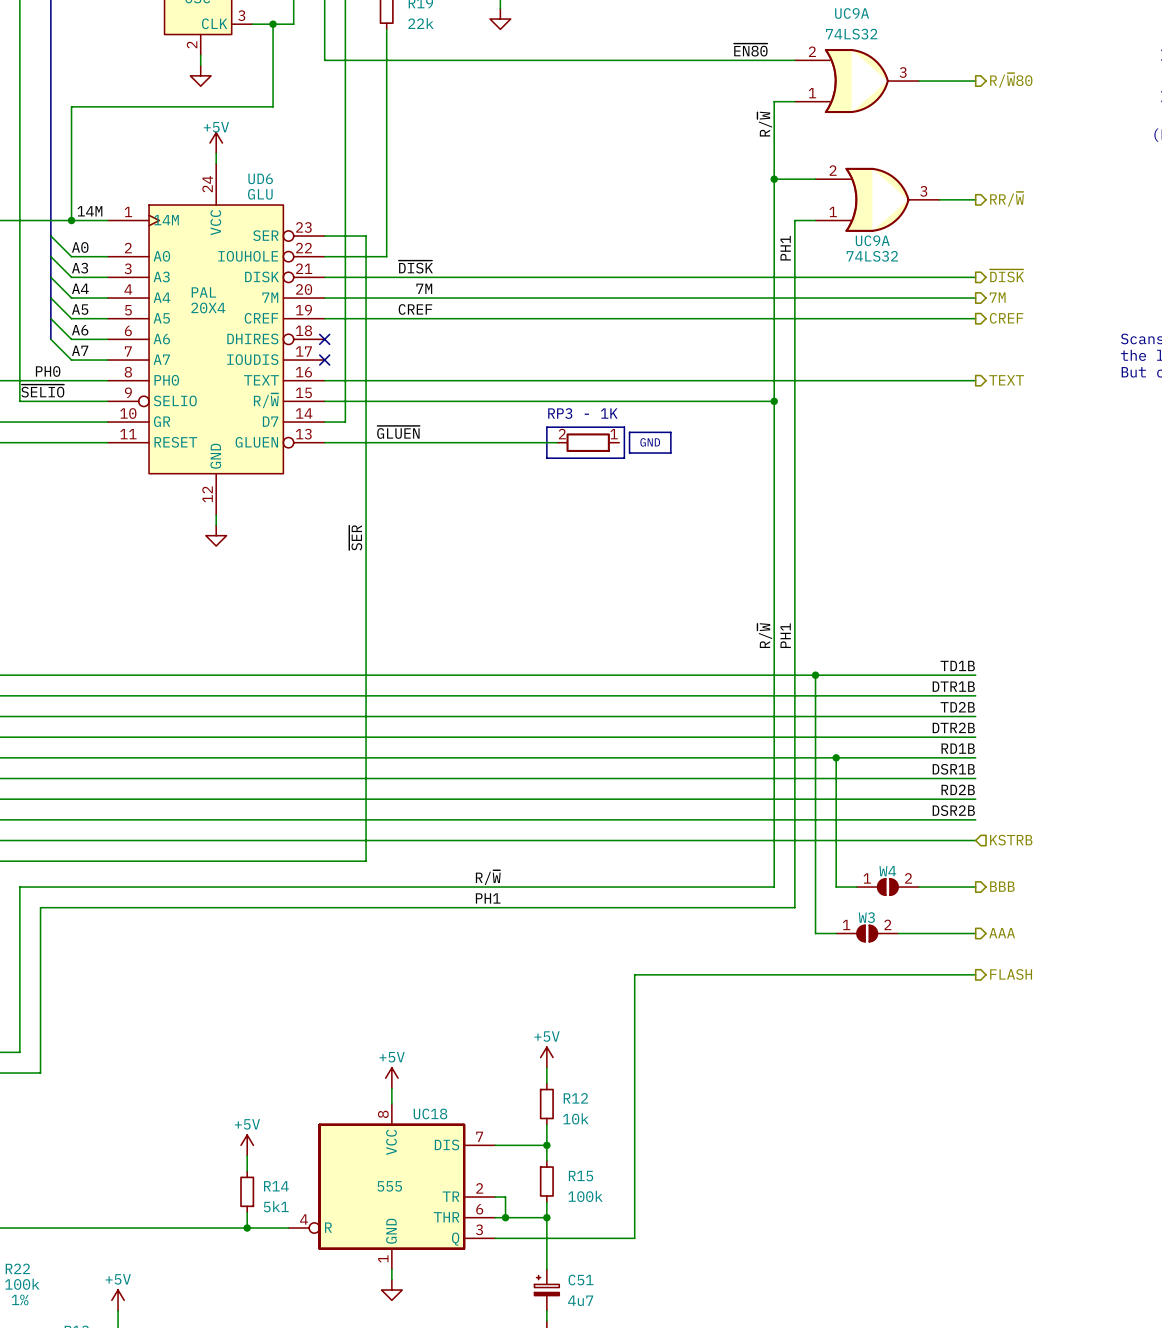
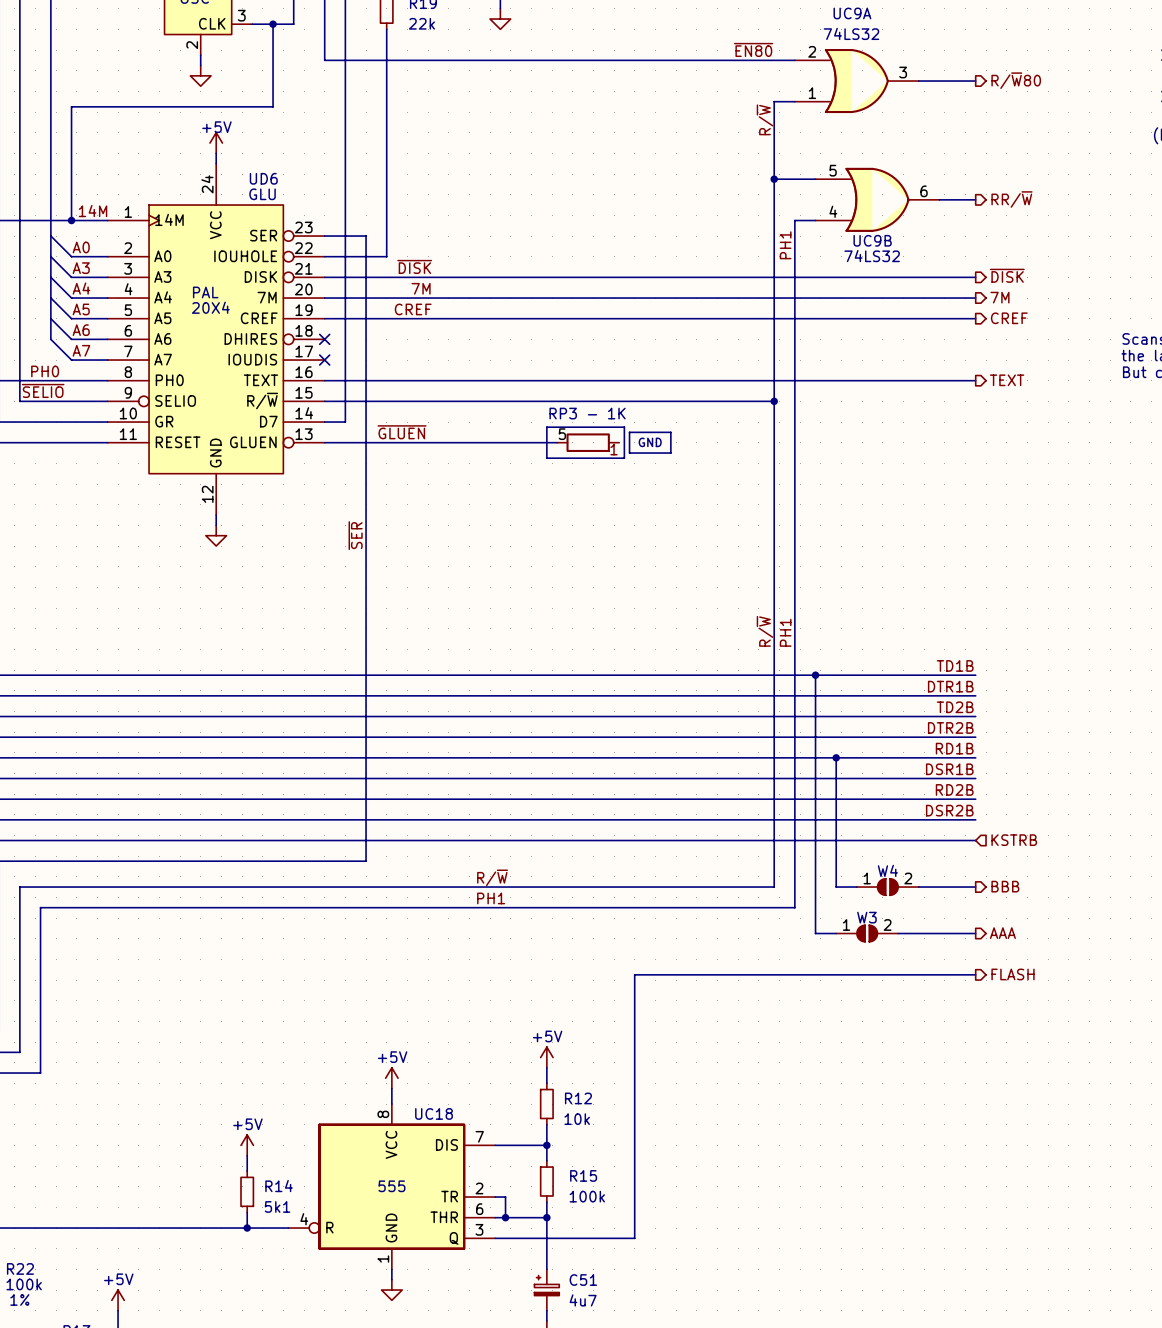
UC9A pin number: 2 (833, 170) -> 5 (833, 170)
UC9A pin number: 3 (923, 191) -> 6 (924, 191)
UC9A pin number: 1 (833, 212) -> 4 (833, 211)
UC9A name: UC9A (872, 240) -> UC9B (872, 240)
part symbol: [557, 433, 620, 452] -> [557, 433, 620, 452]

